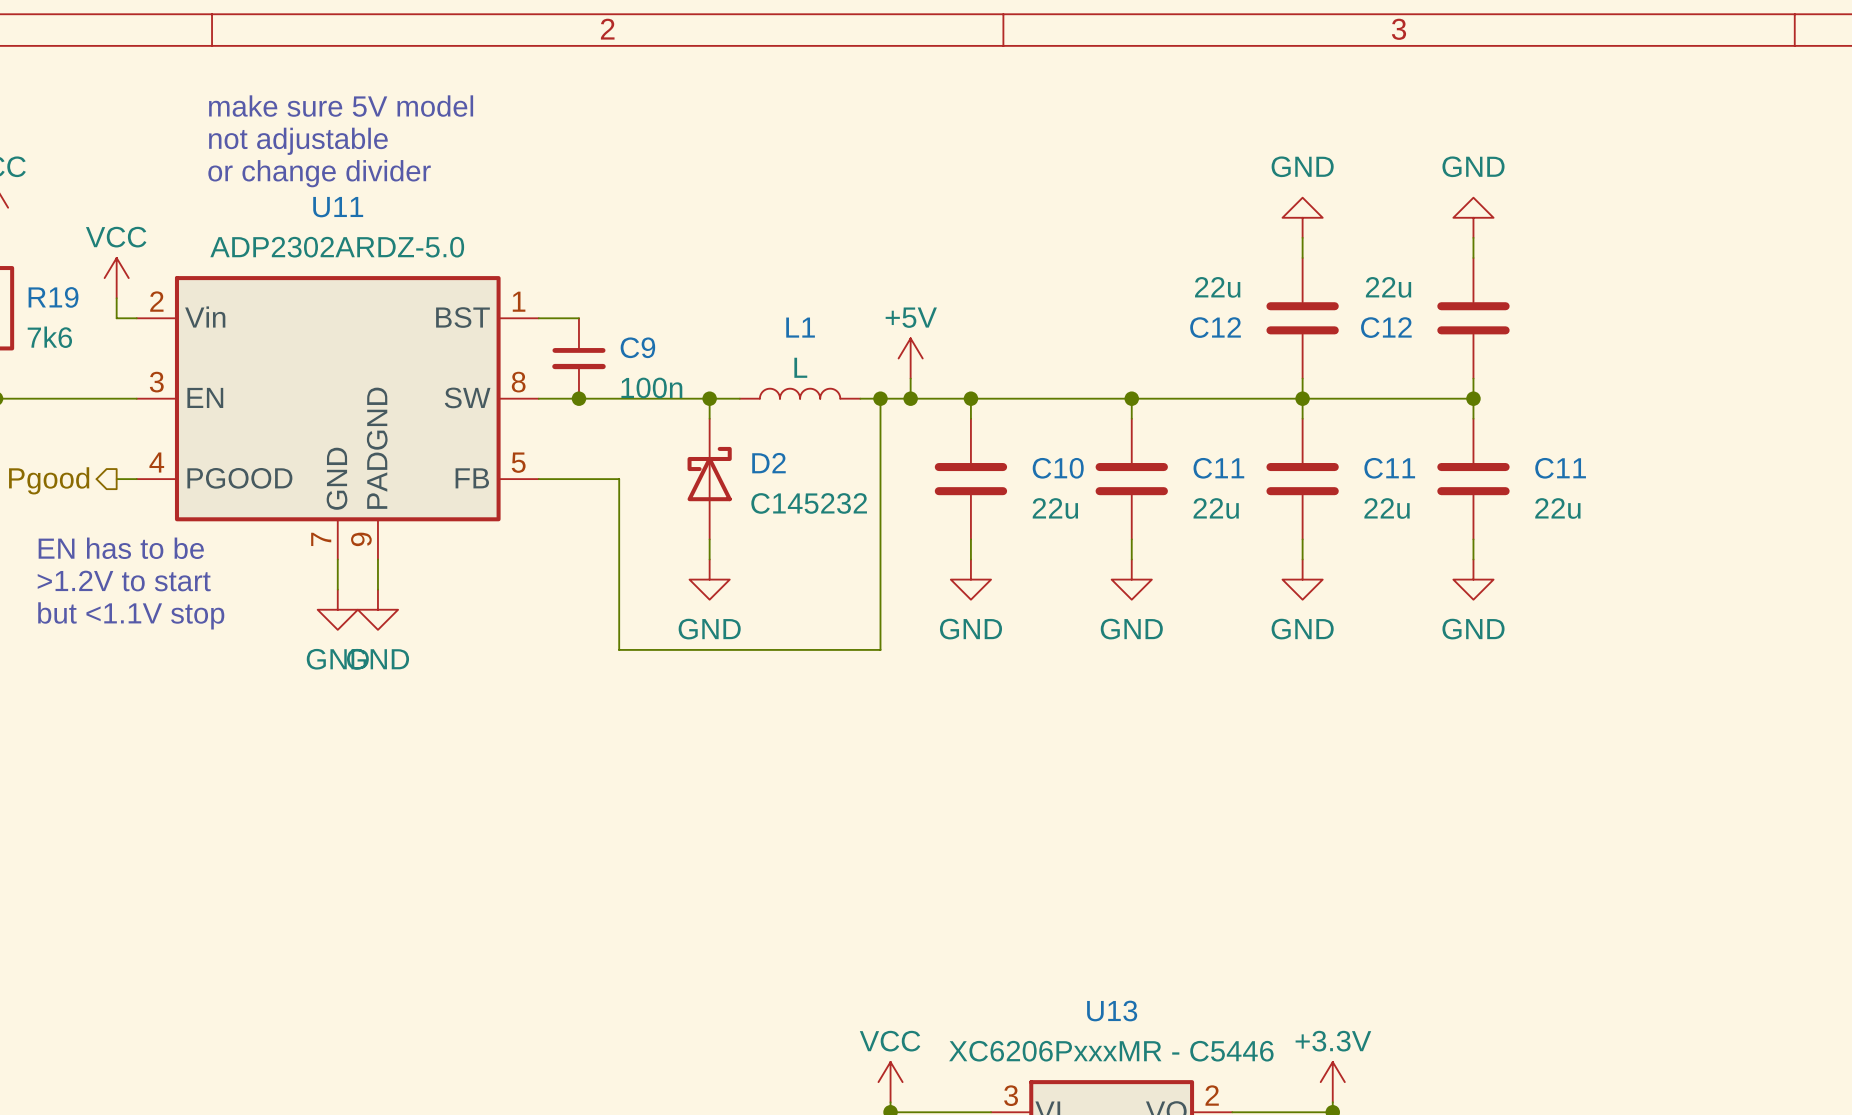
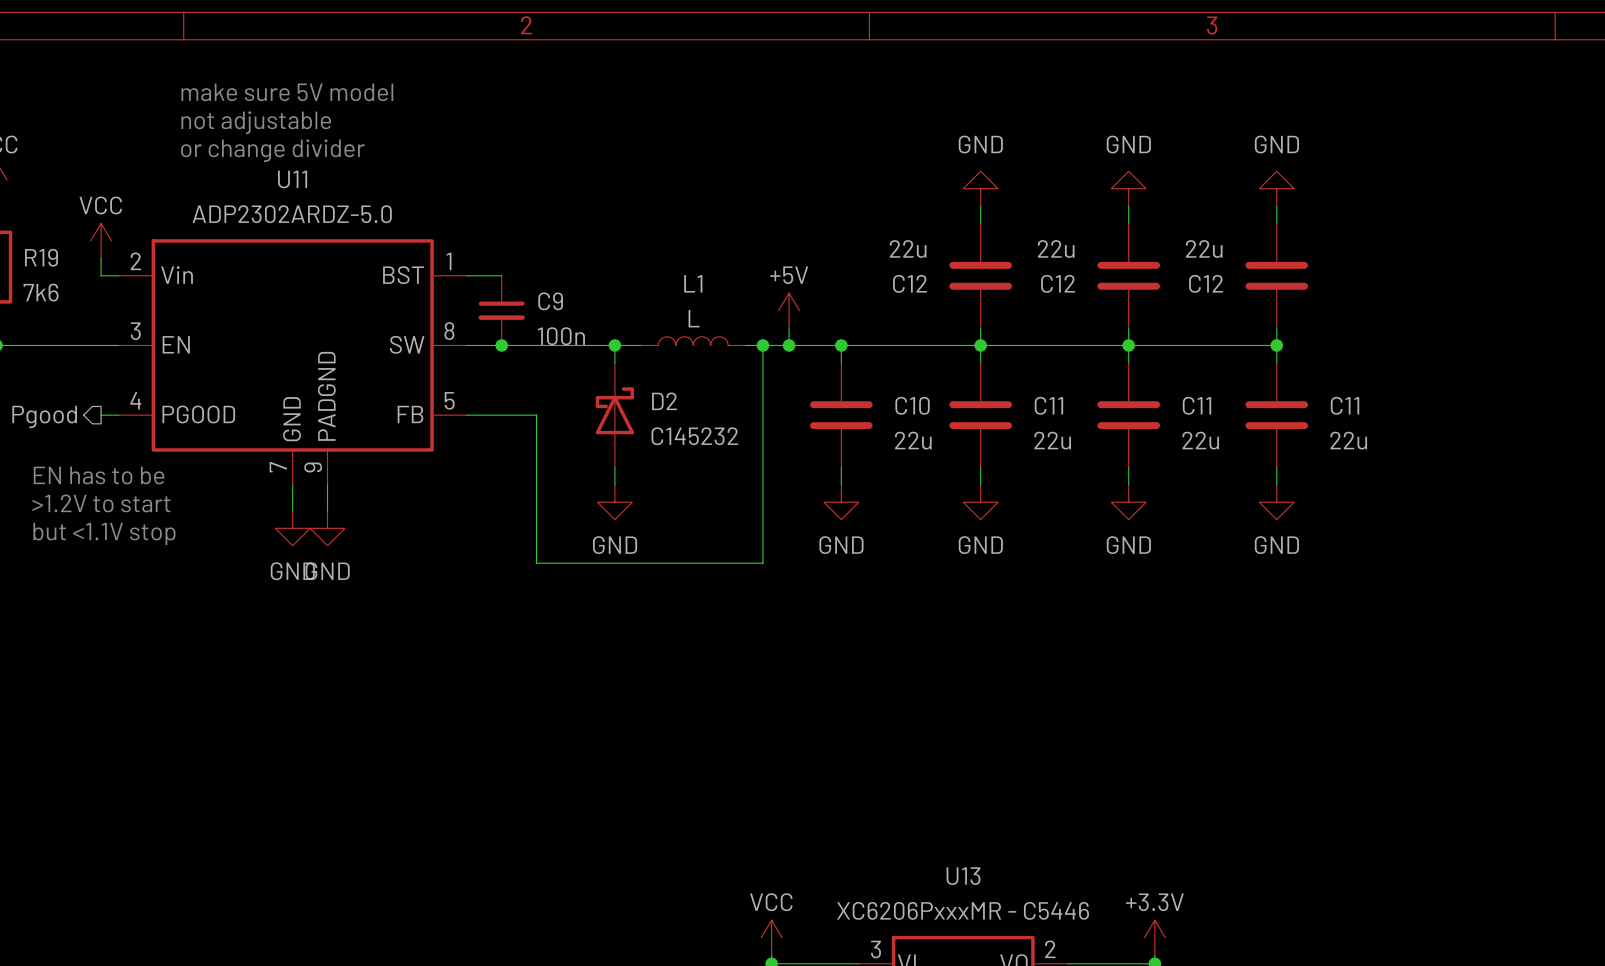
power symbol: none -> GND (980, 188)
wire: none -> (980, 206) (980, 223)
C12: none -> 22u (980, 275)
wire: none -> (980, 328) (980, 345)

